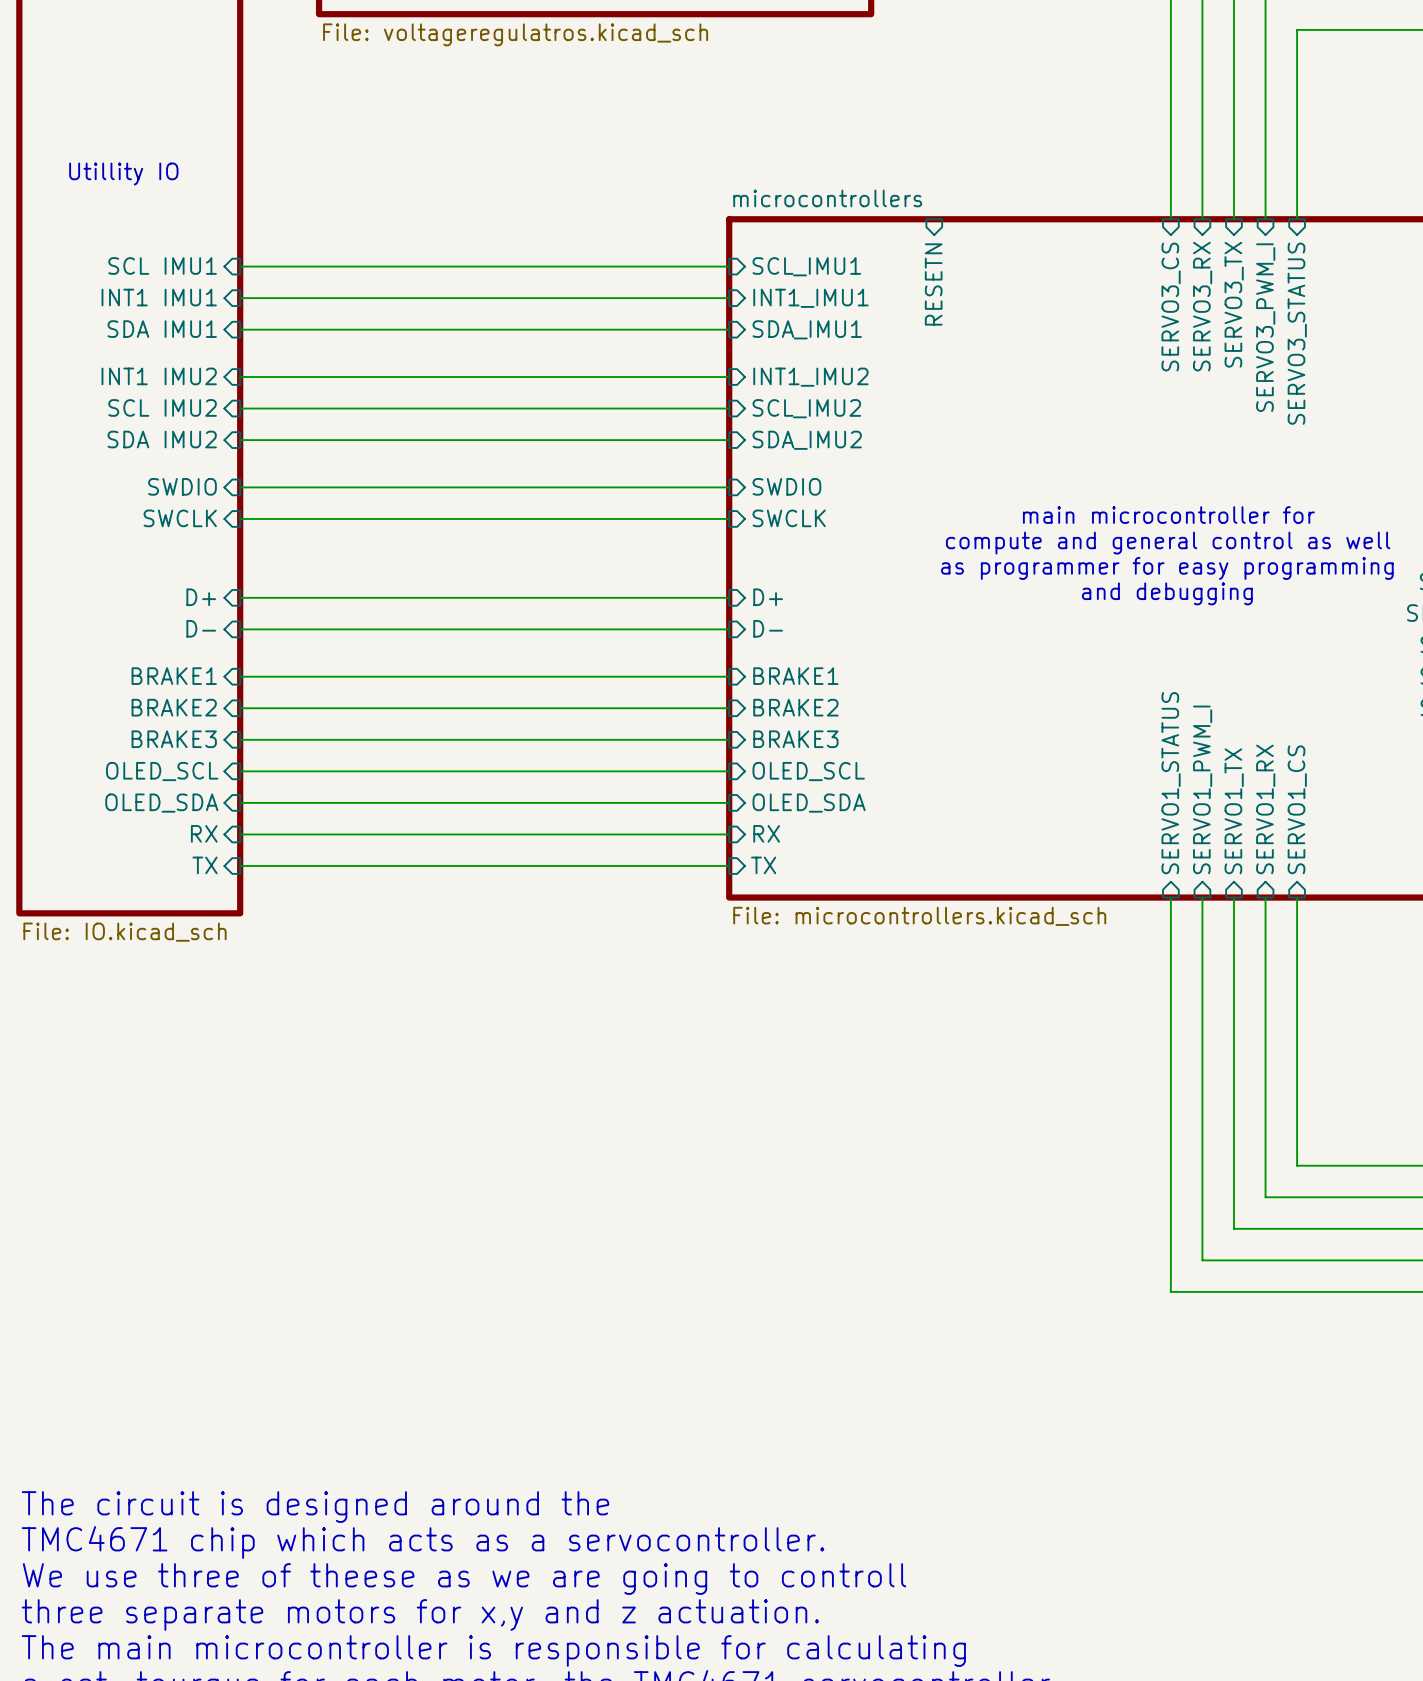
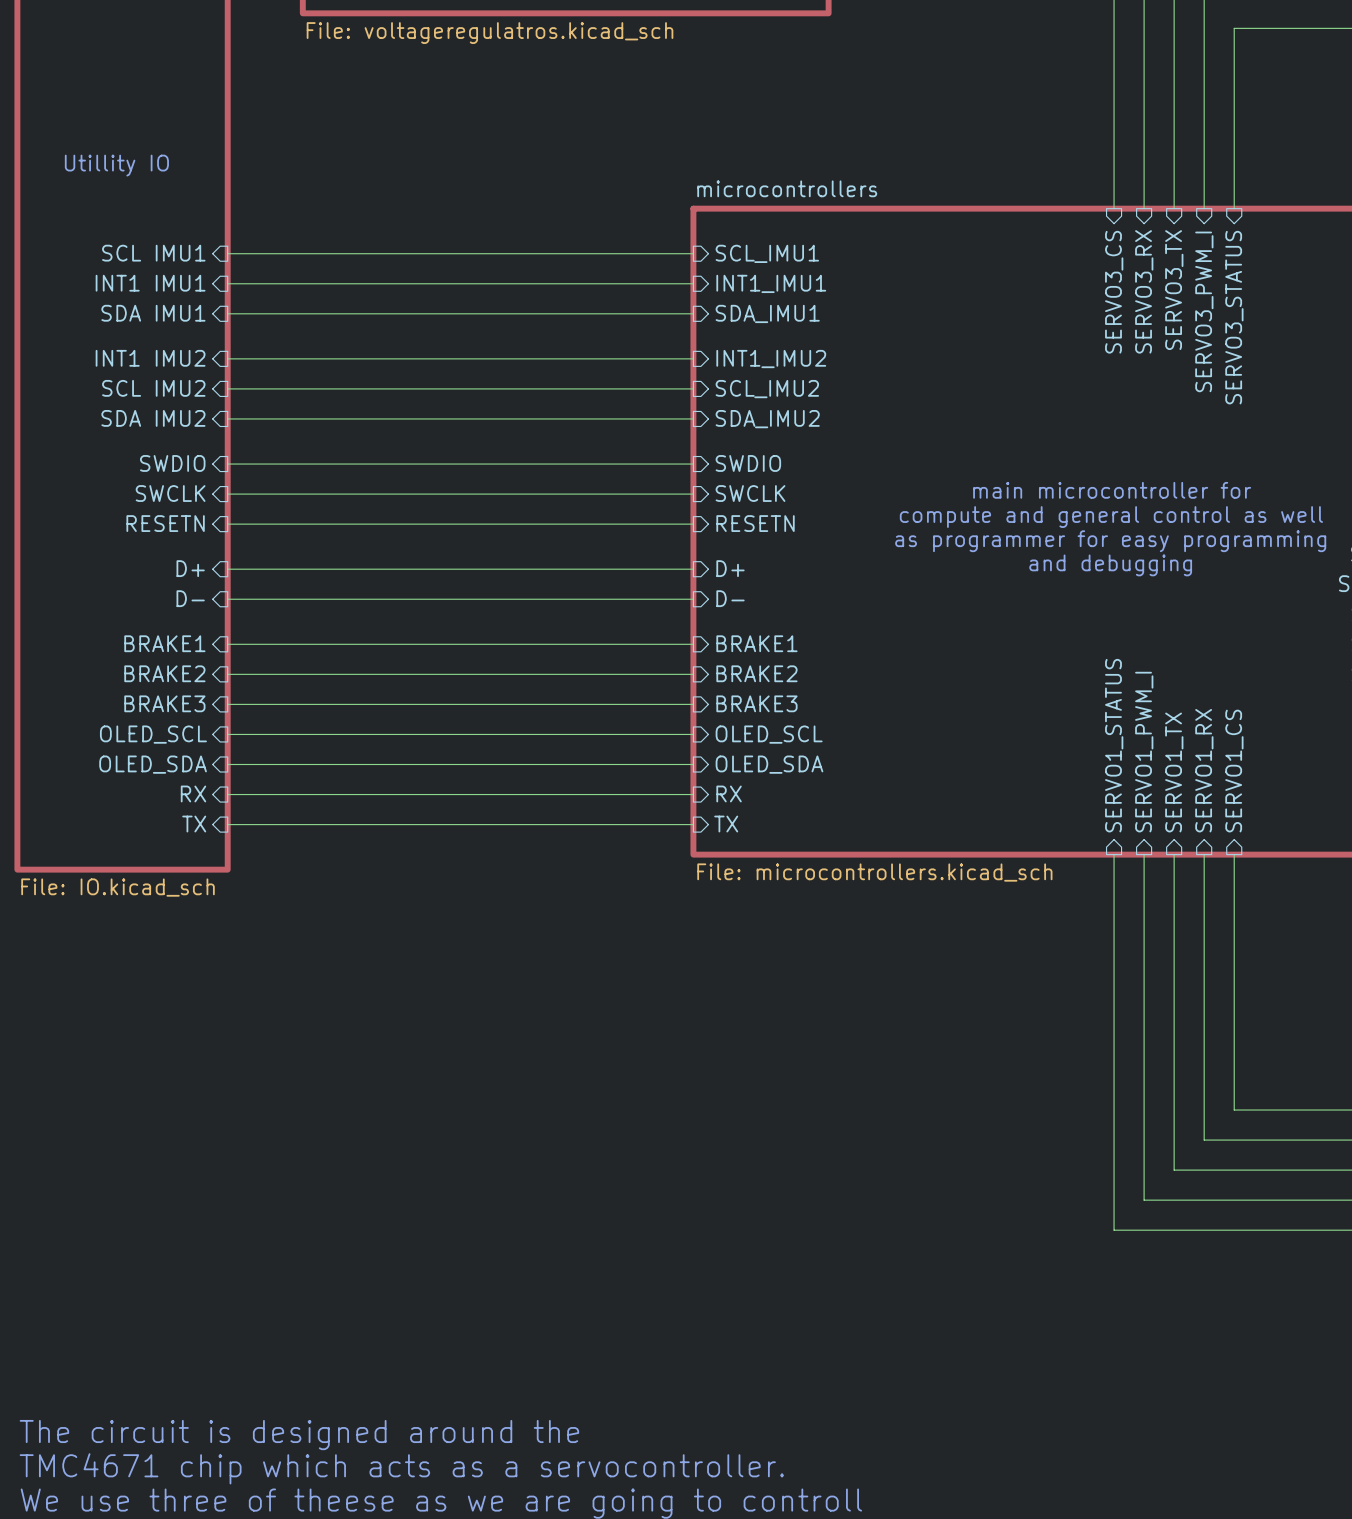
sheet pin: RESETN (933, 284) -> none
sheet pin: none -> RESETN (165, 523)
sheet pin: none -> RESETN (755, 523)
wire: none -> (227, 524) (693, 524)

